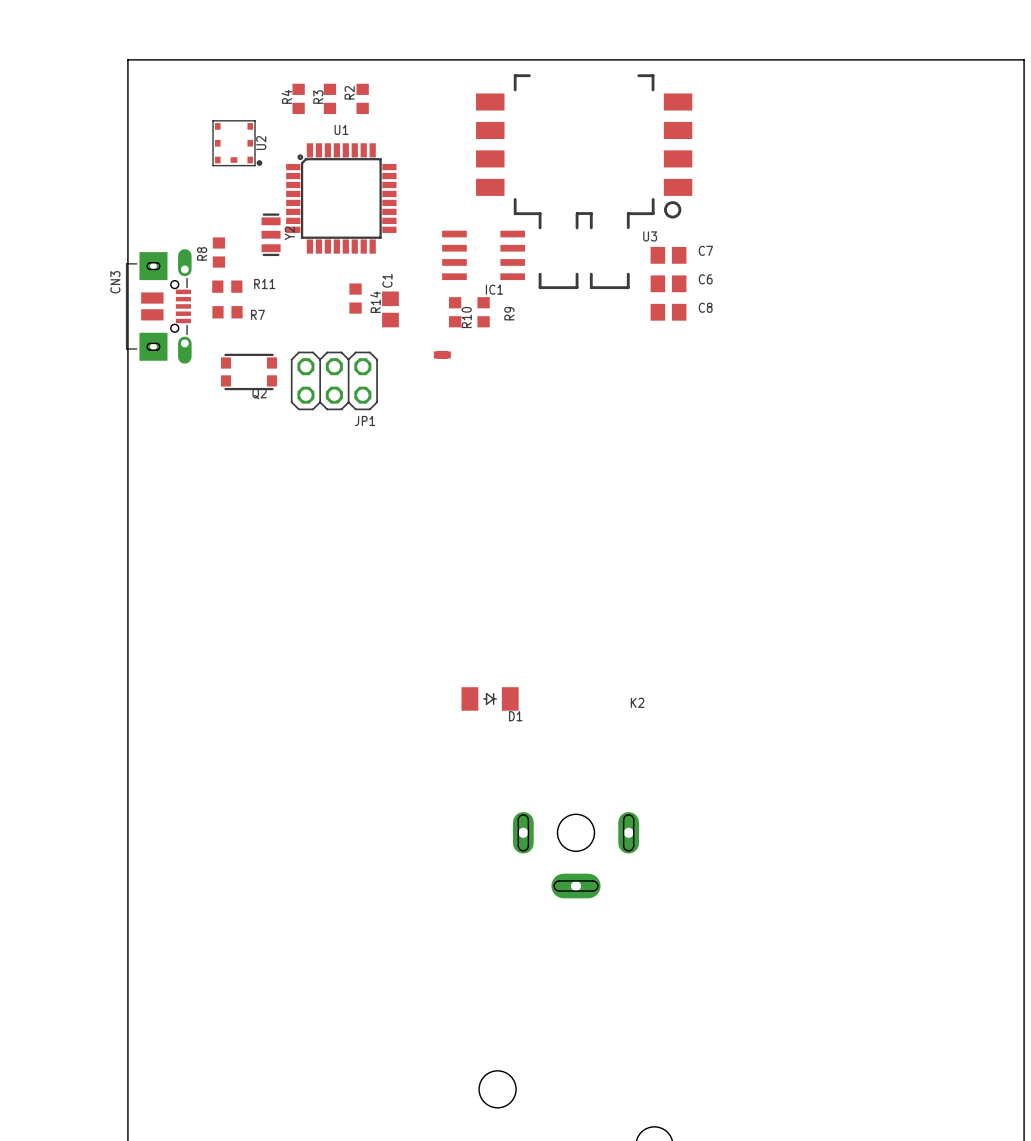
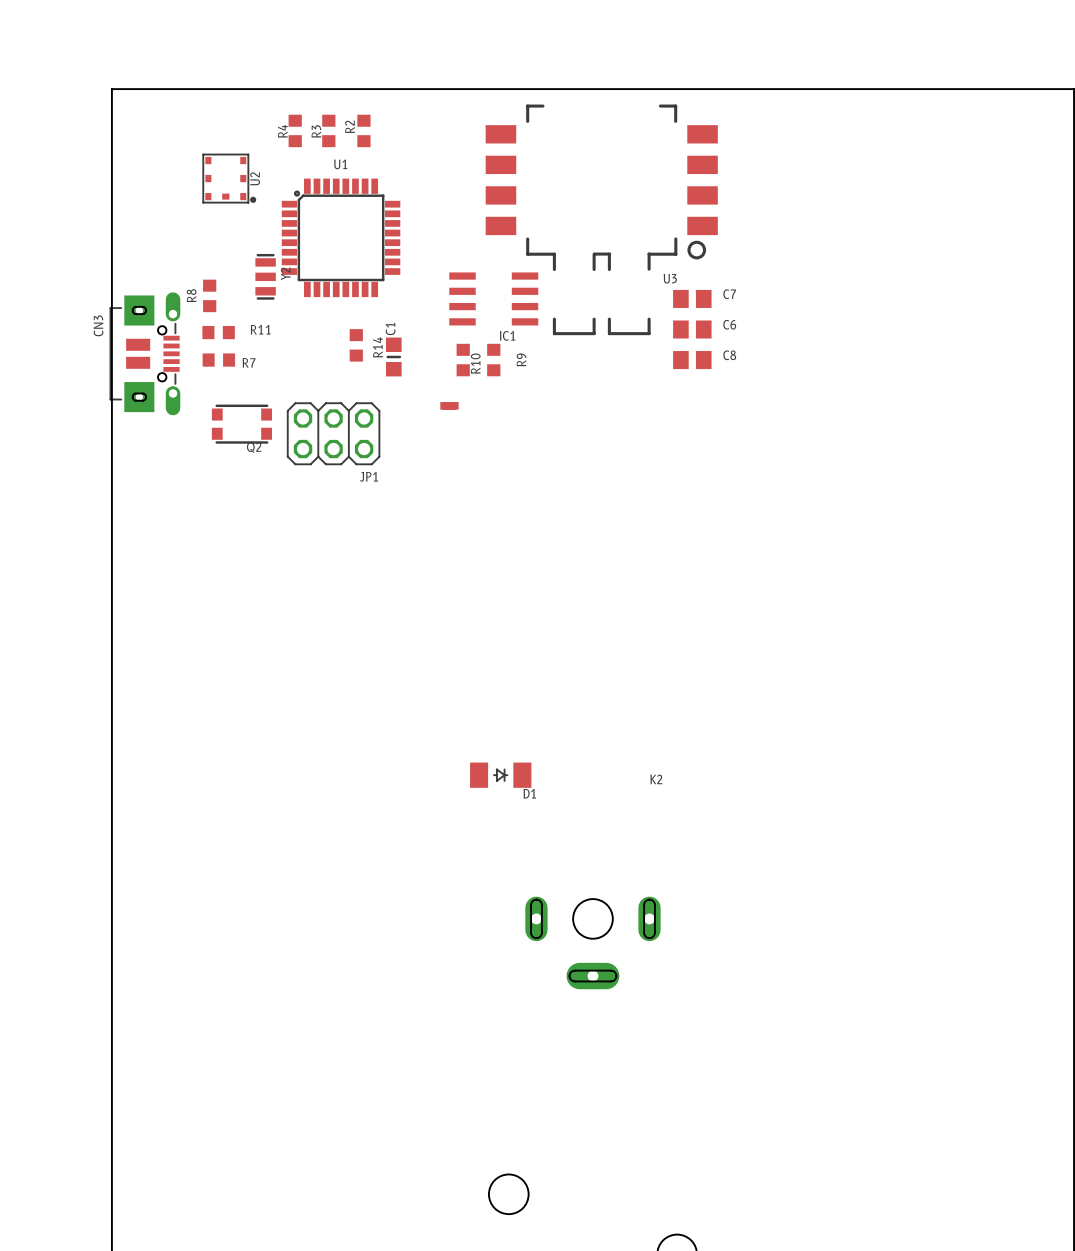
C1 footprint: [382, 291, 399, 328] -> [385, 337, 402, 377]

